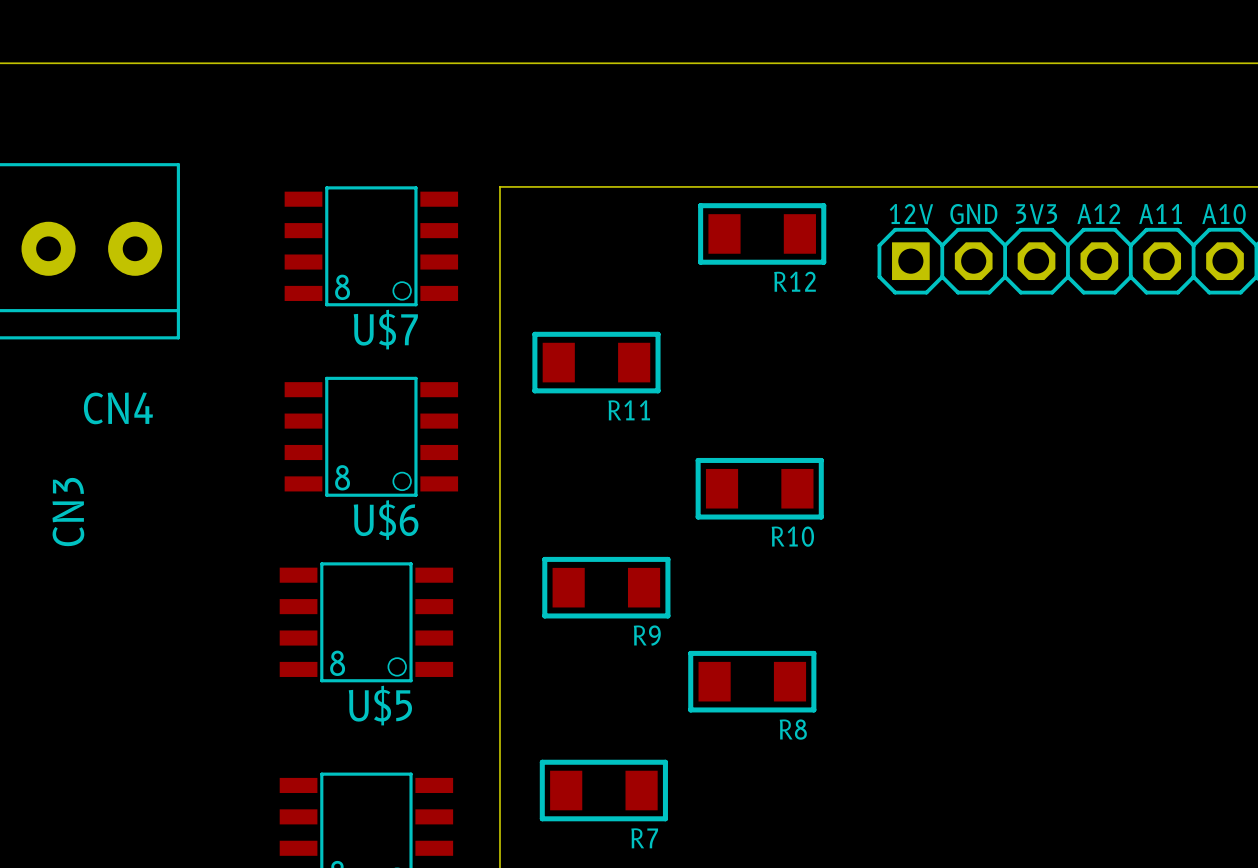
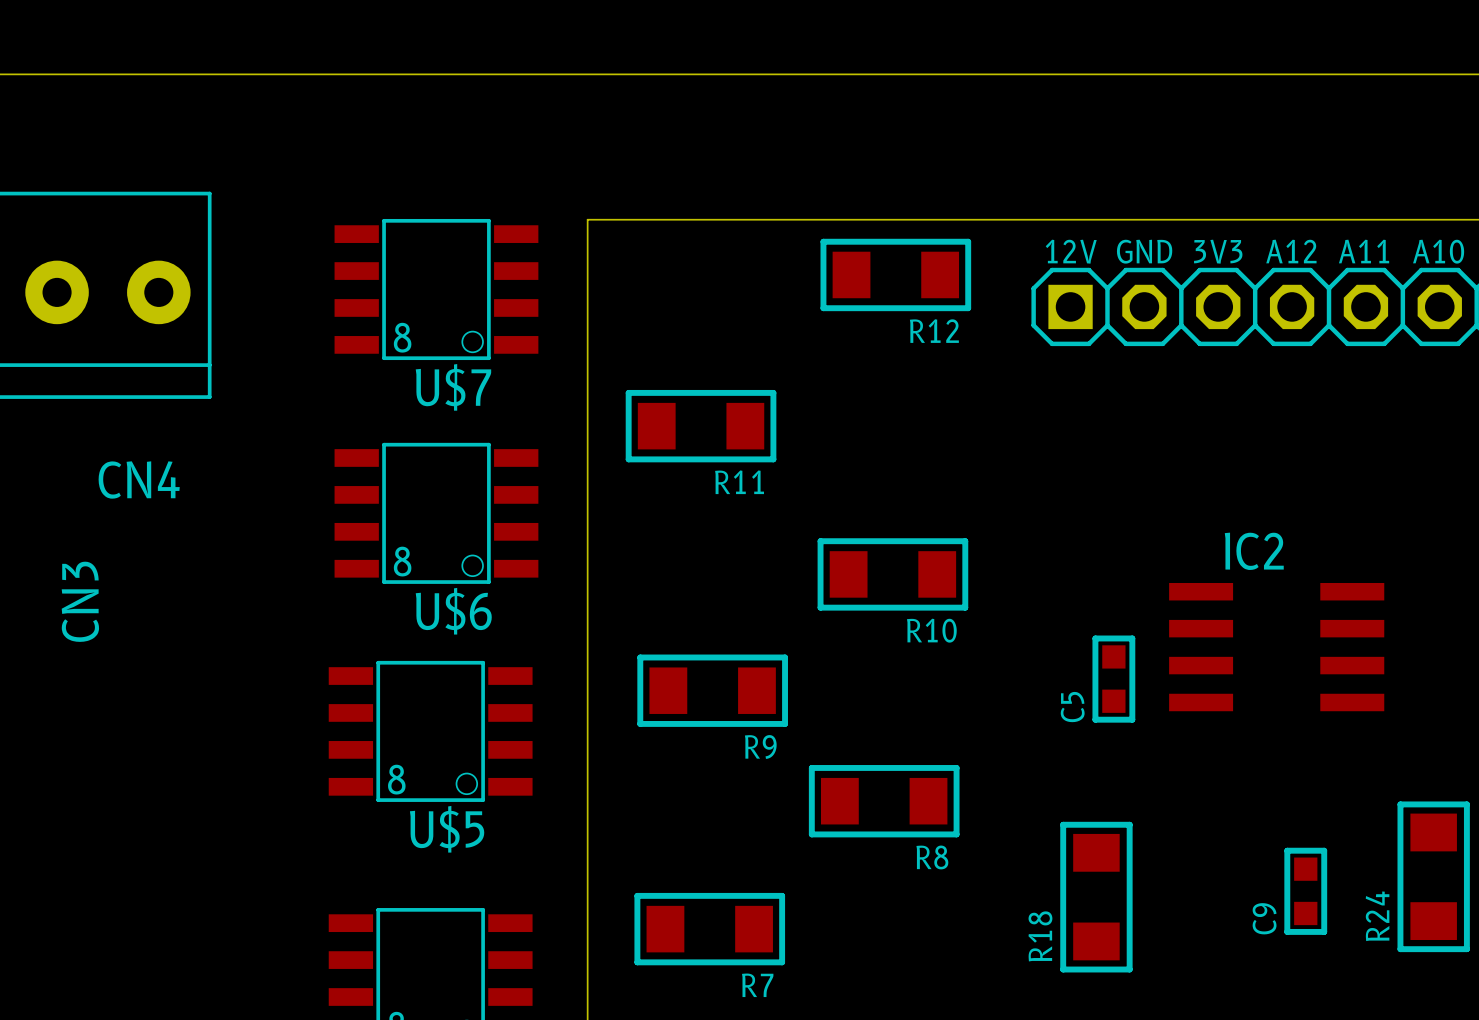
IC2: none -> (1276, 647)
C5: none -> (1113, 679)
R24: none -> (1433, 876)
C9: none -> (1305, 891)
R18: none -> (1096, 897)

